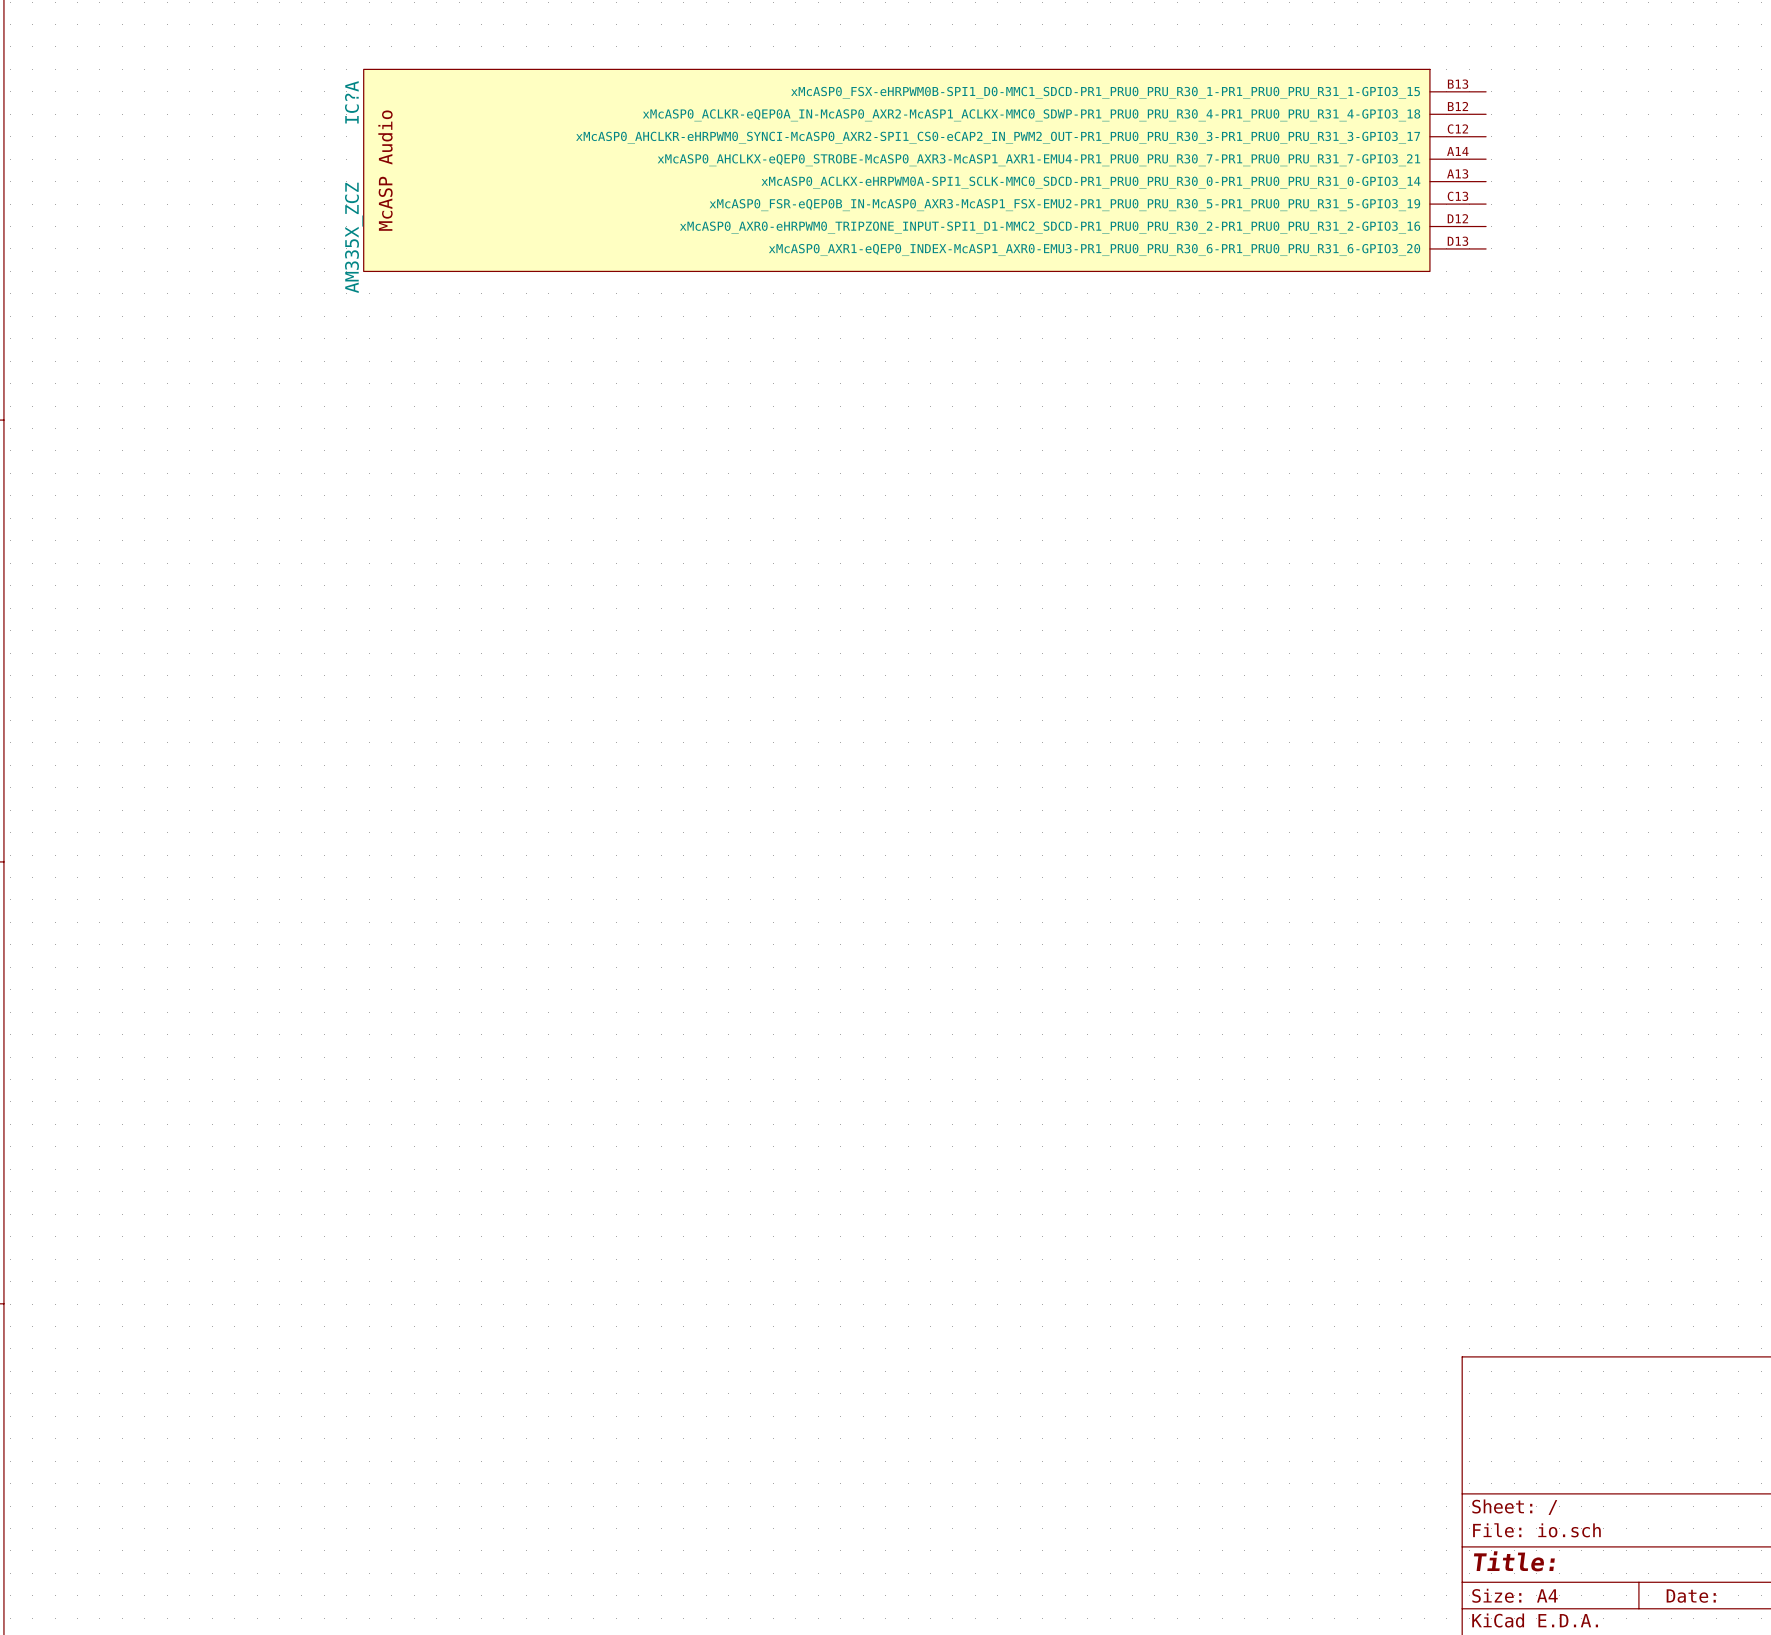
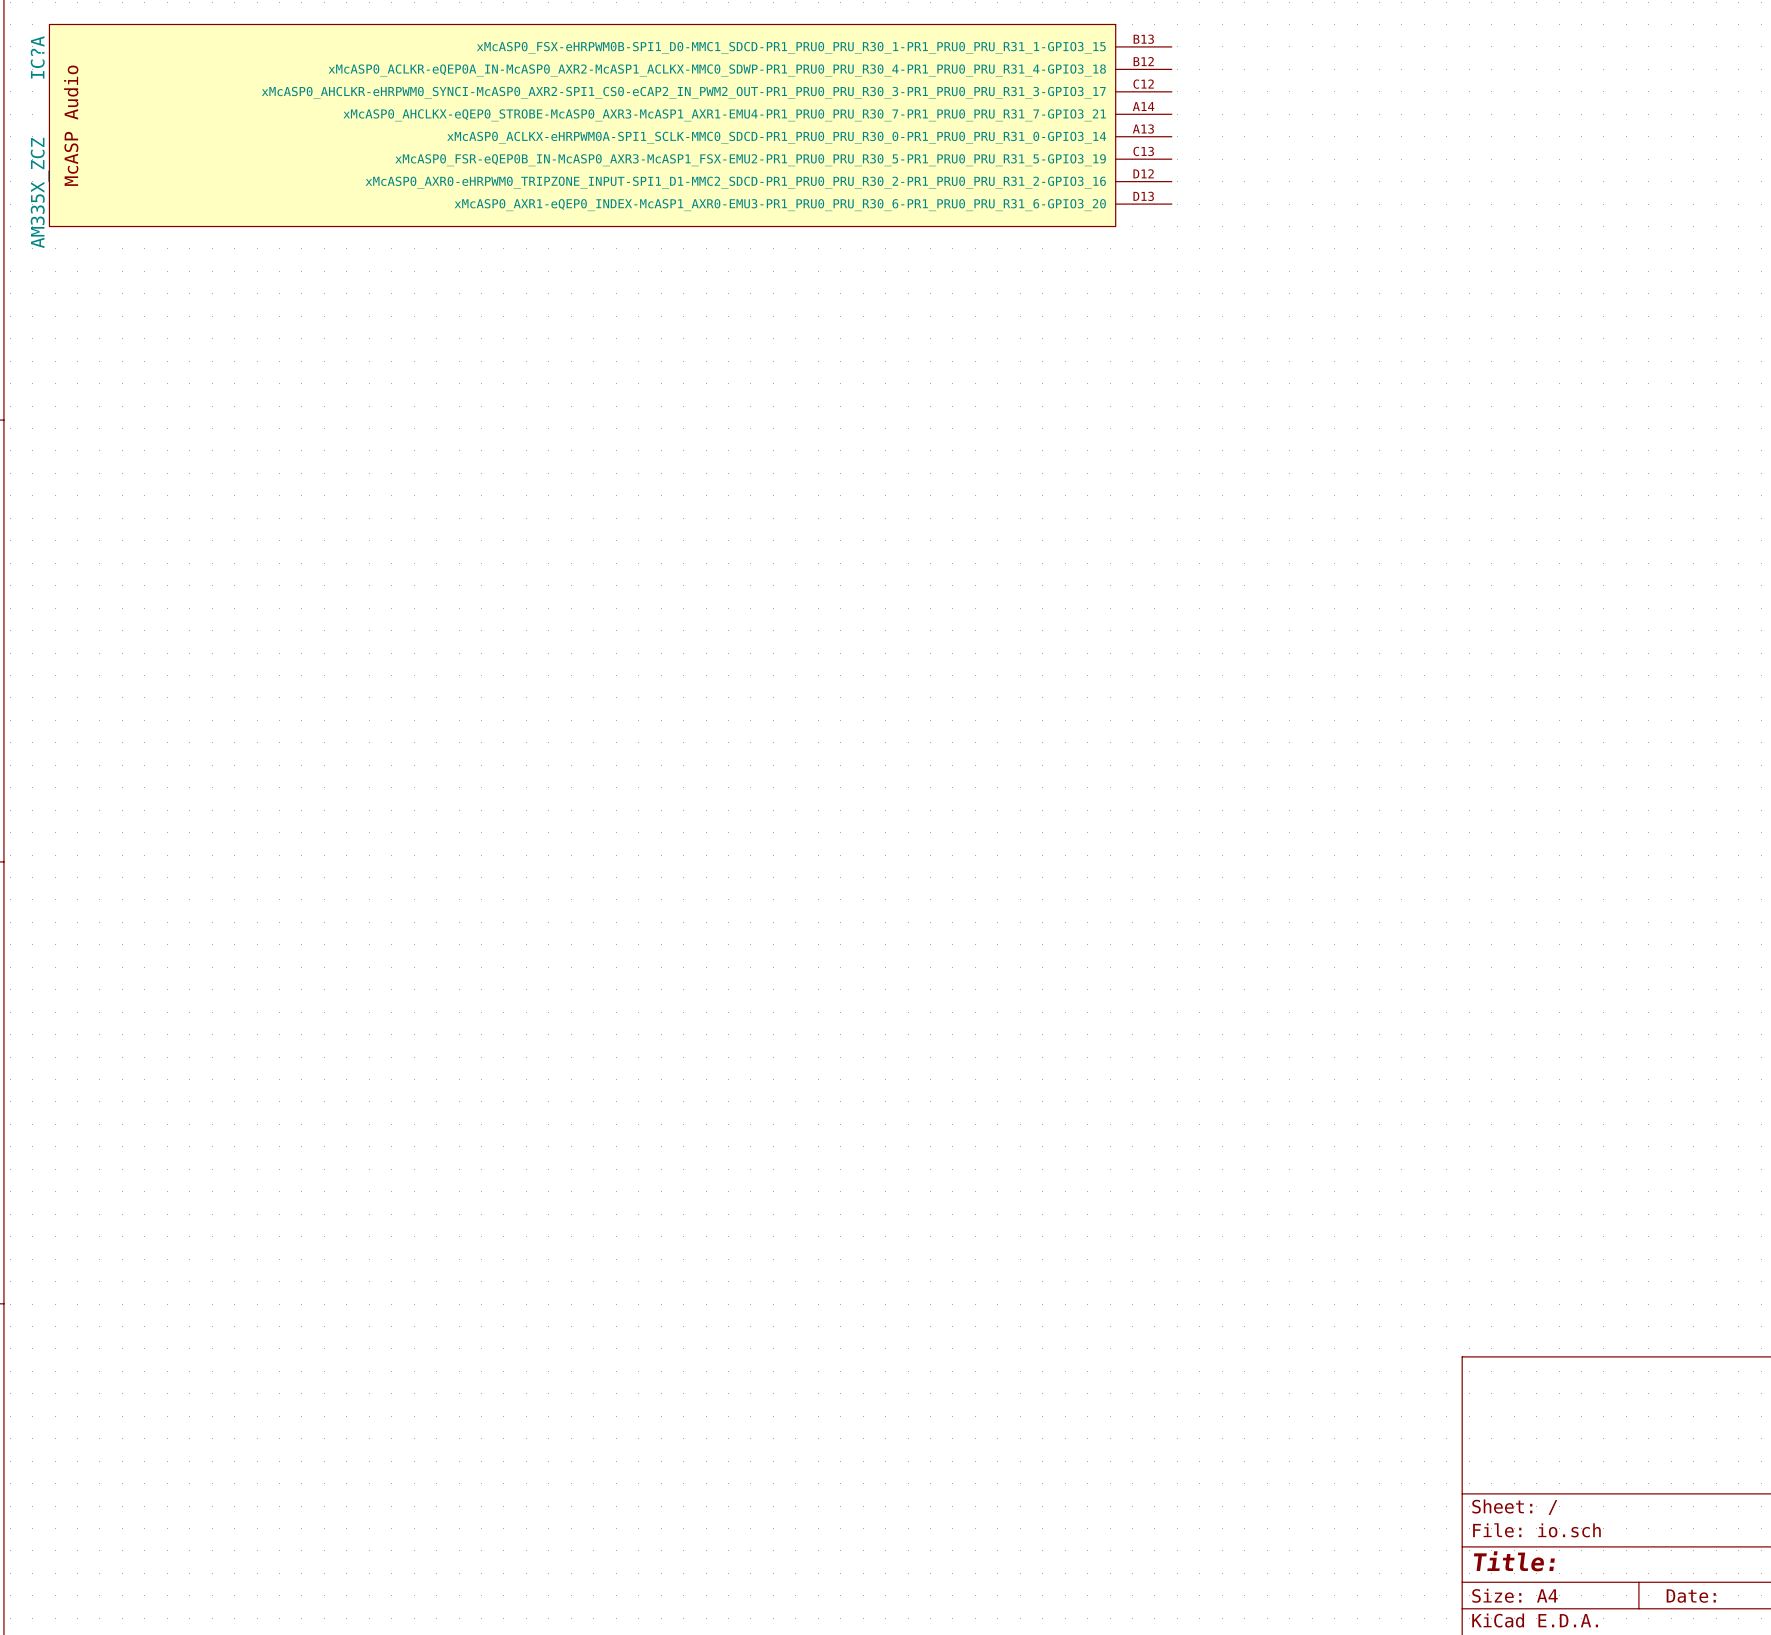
IC?A: none -> AM335X_ZCZ (610, 125)
IC?A: AM335X_ZCZ (924, 170) -> none

